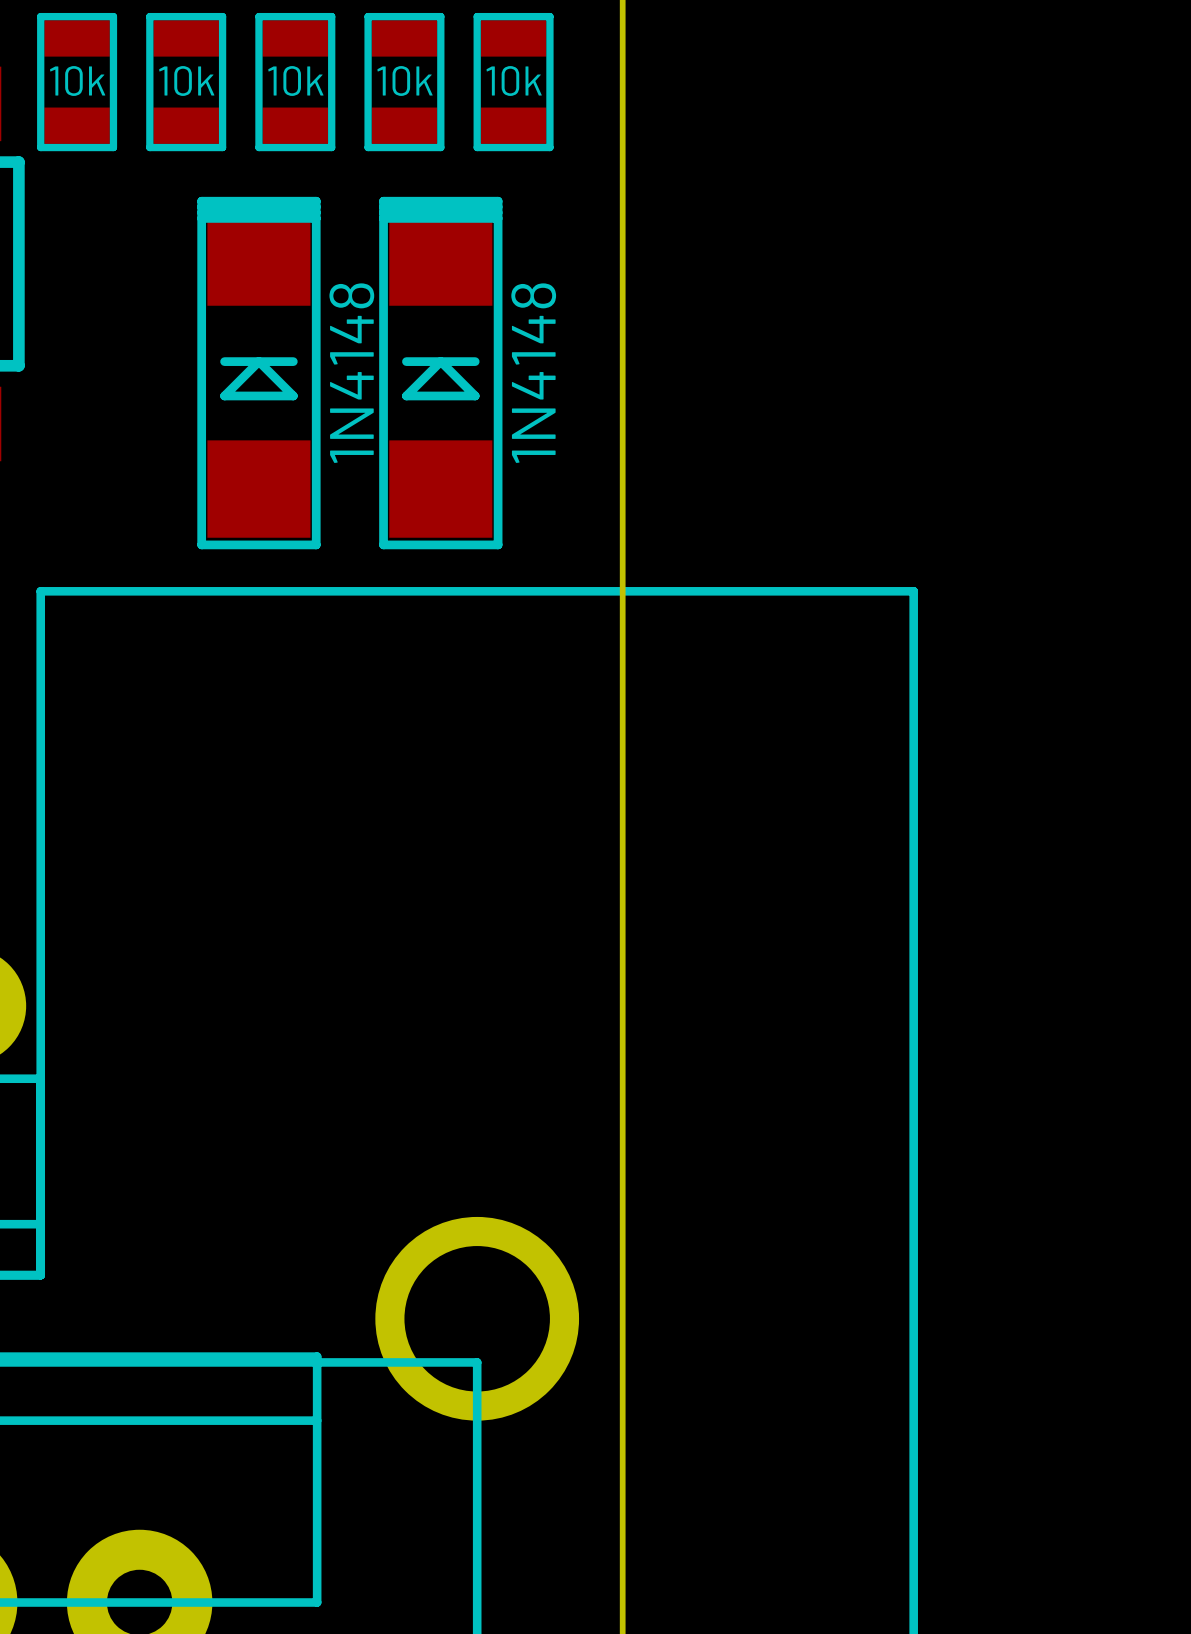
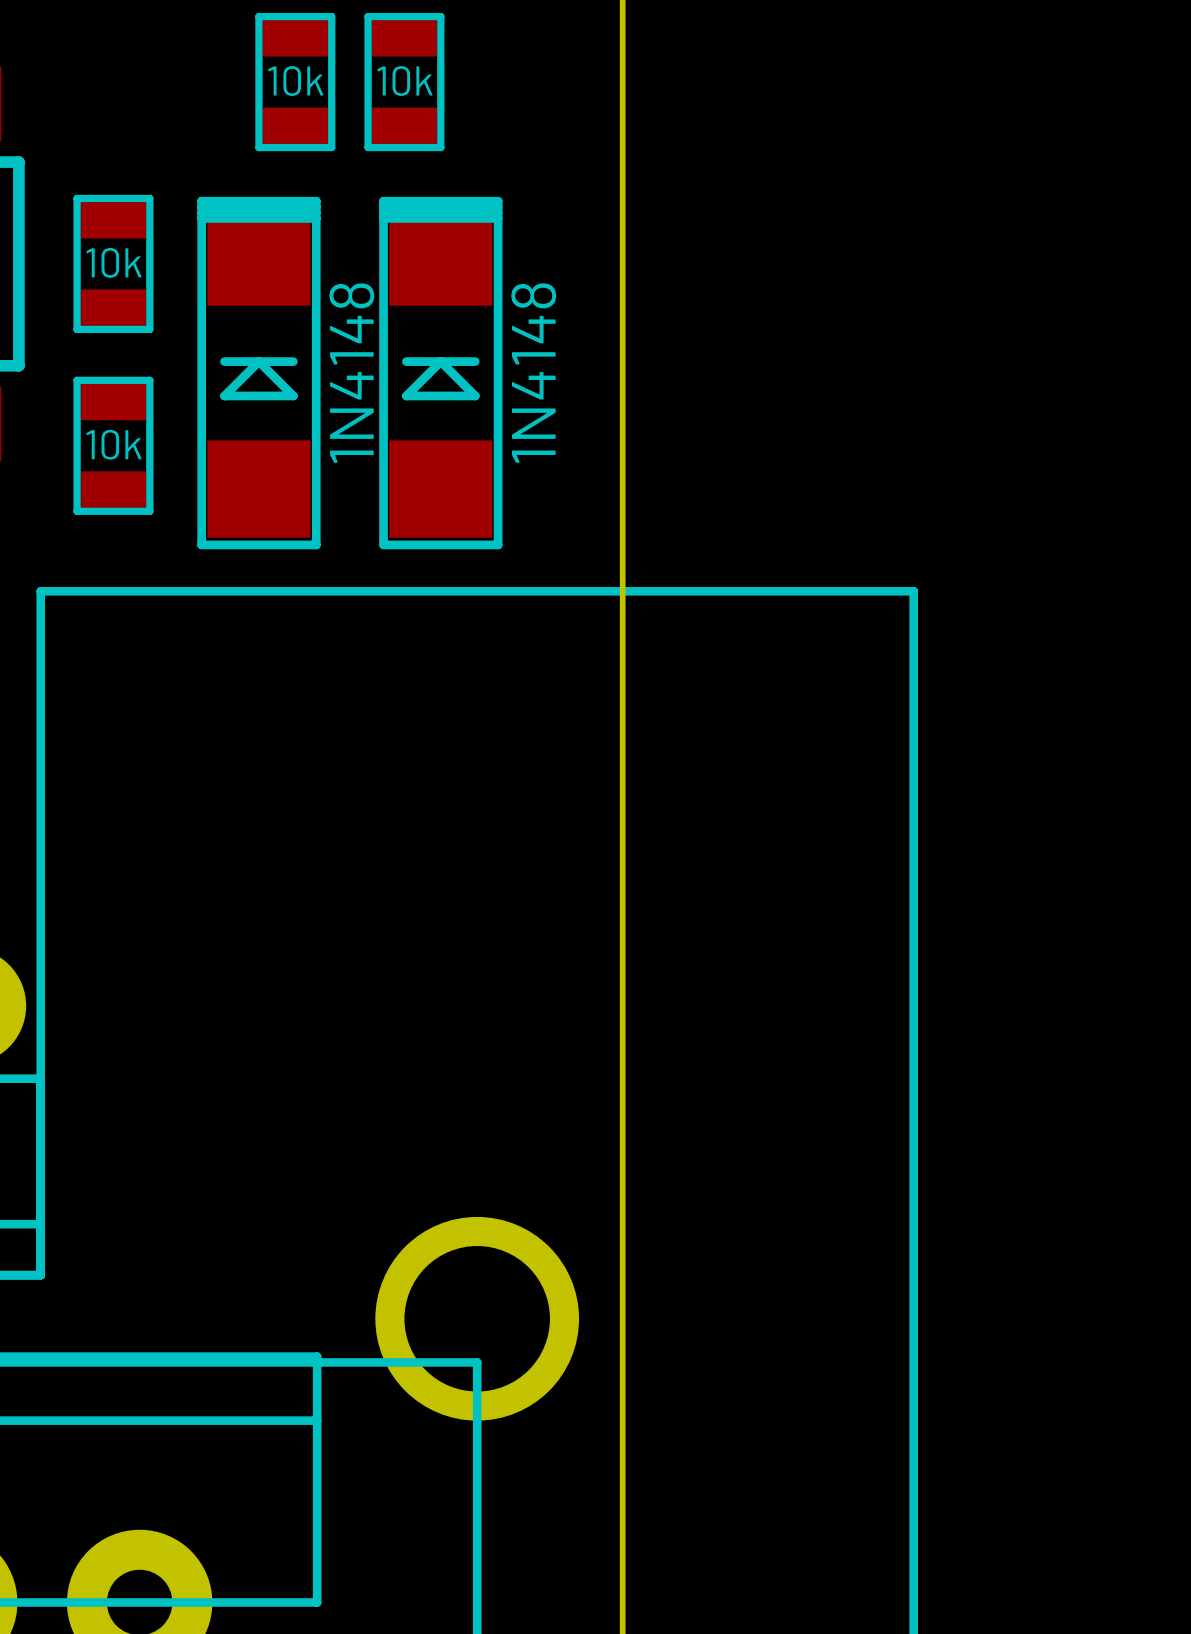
part: 10k (77, 82) -> none
part: 10k (186, 82) -> none
part: 10k (513, 82) -> none
part: none -> 10k (113, 263)
part: none -> 10k (113, 445)

